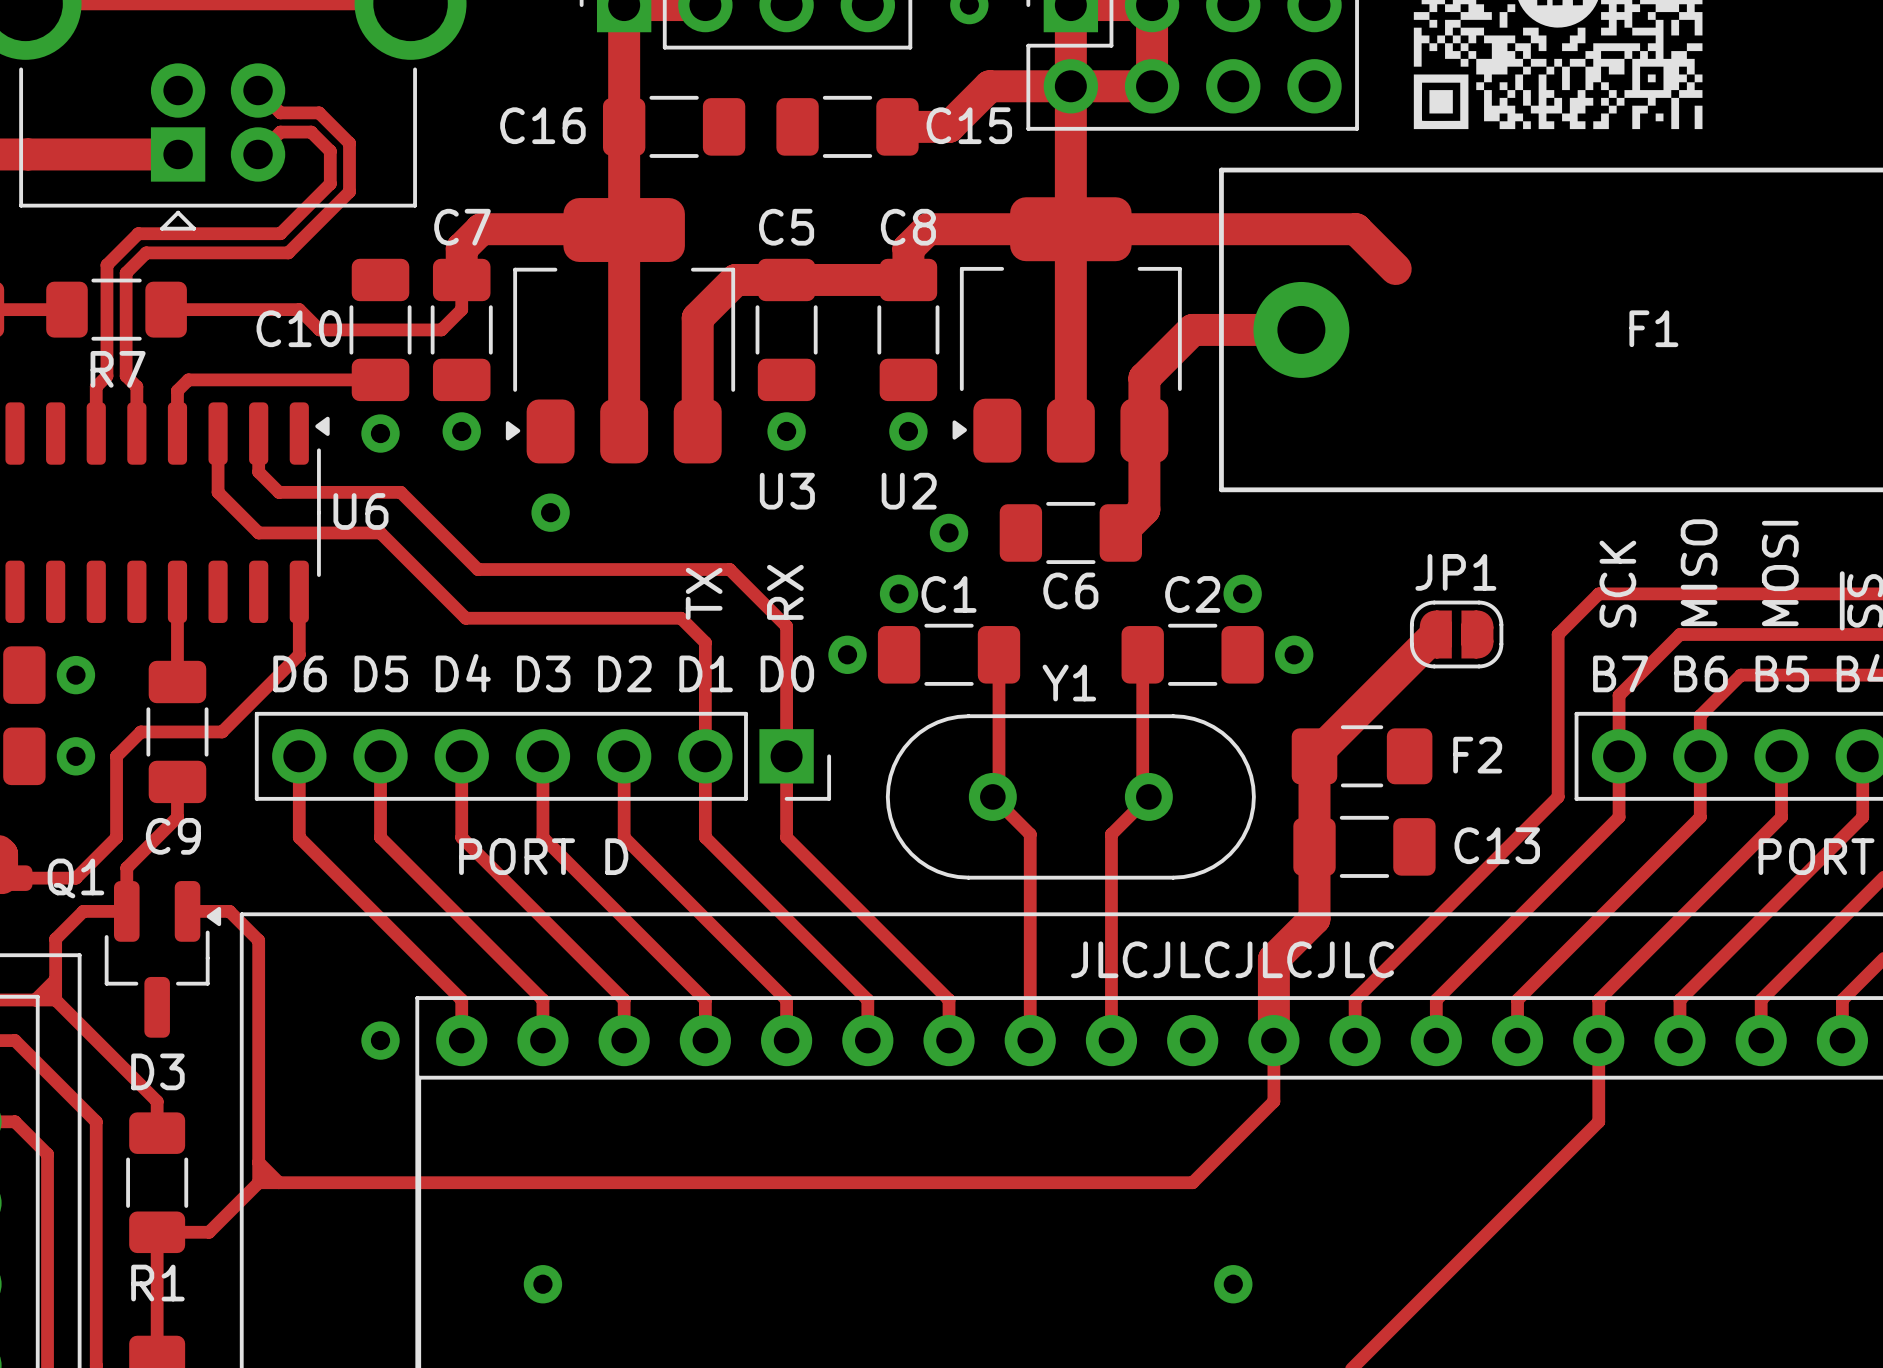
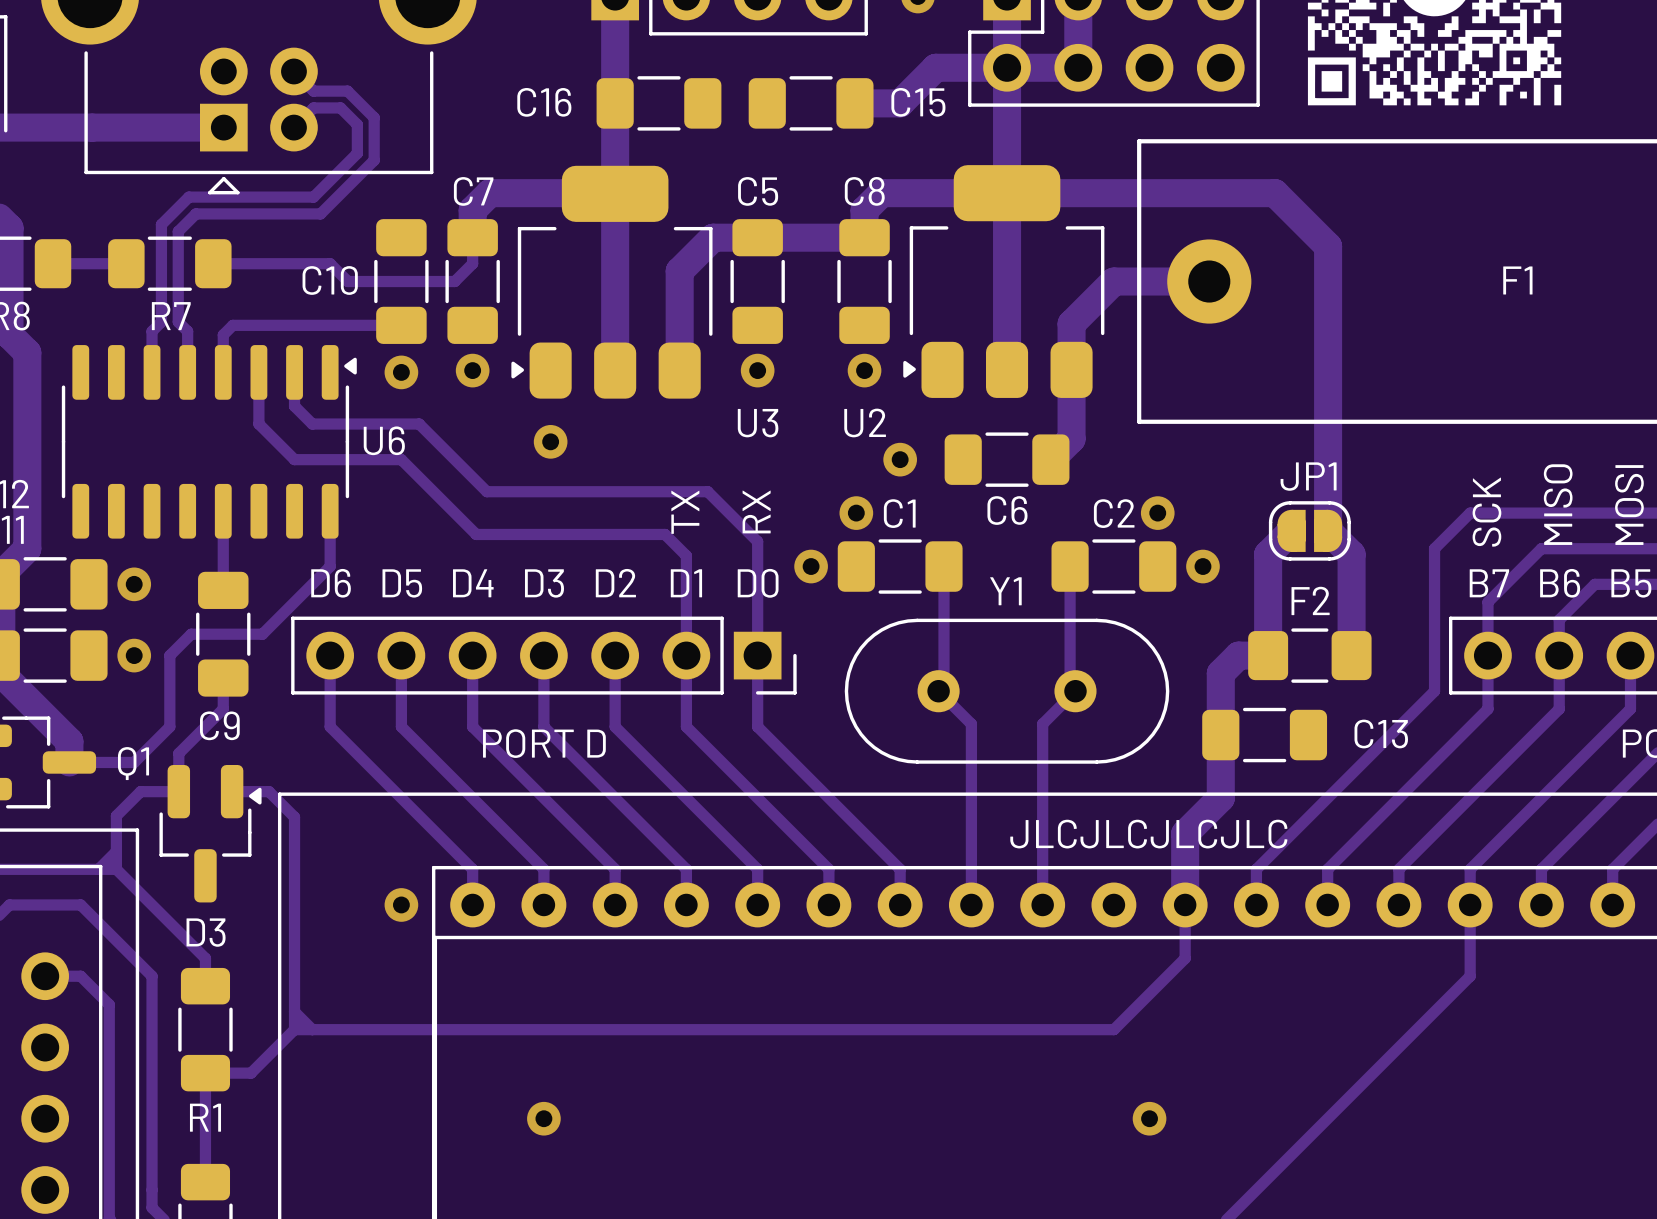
track: (1355, 229) (1395, 269) -> (1257, 193) (1274, 193) (1328, 246) (1328, 530) (1351, 554) (1351, 655)
track: (1435, 634) (1314, 755) (1314, 776) -> (1291, 530) (1268, 554) (1268, 655) (1238, 655) (1220, 673)
JP1 position: (1456, 634) -> (1309, 530)
F2 name position: F2 (1477, 755) -> F2 (1310, 600)
F2 position: (1362, 756) -> (1309, 655)

